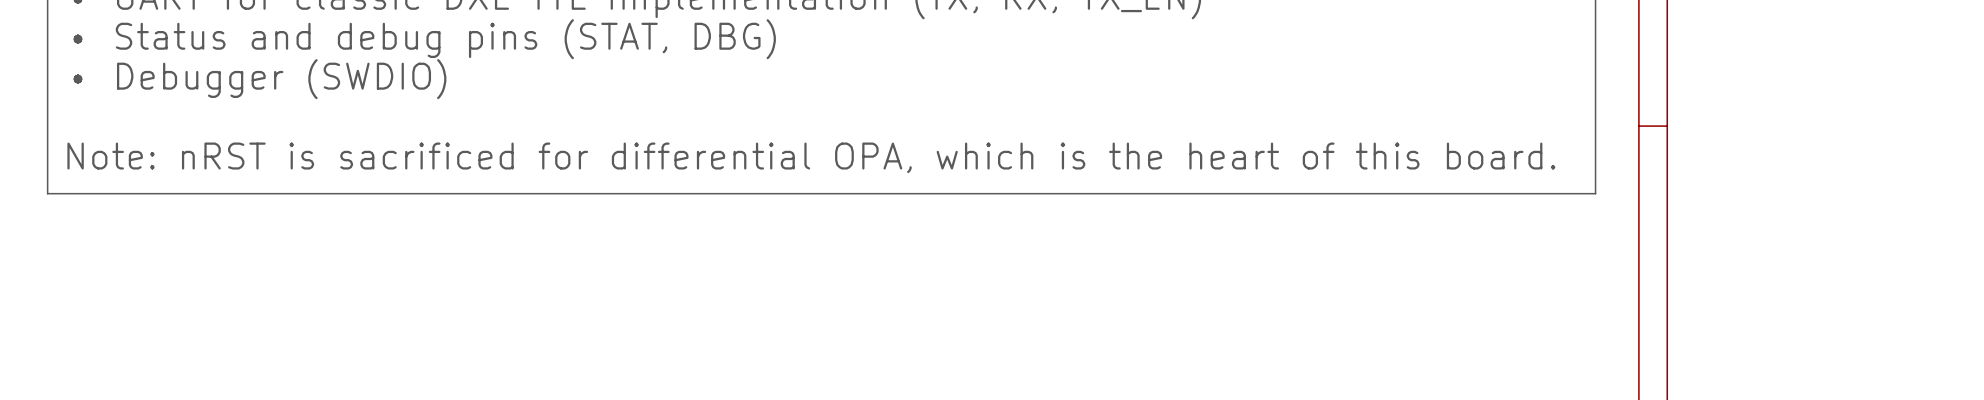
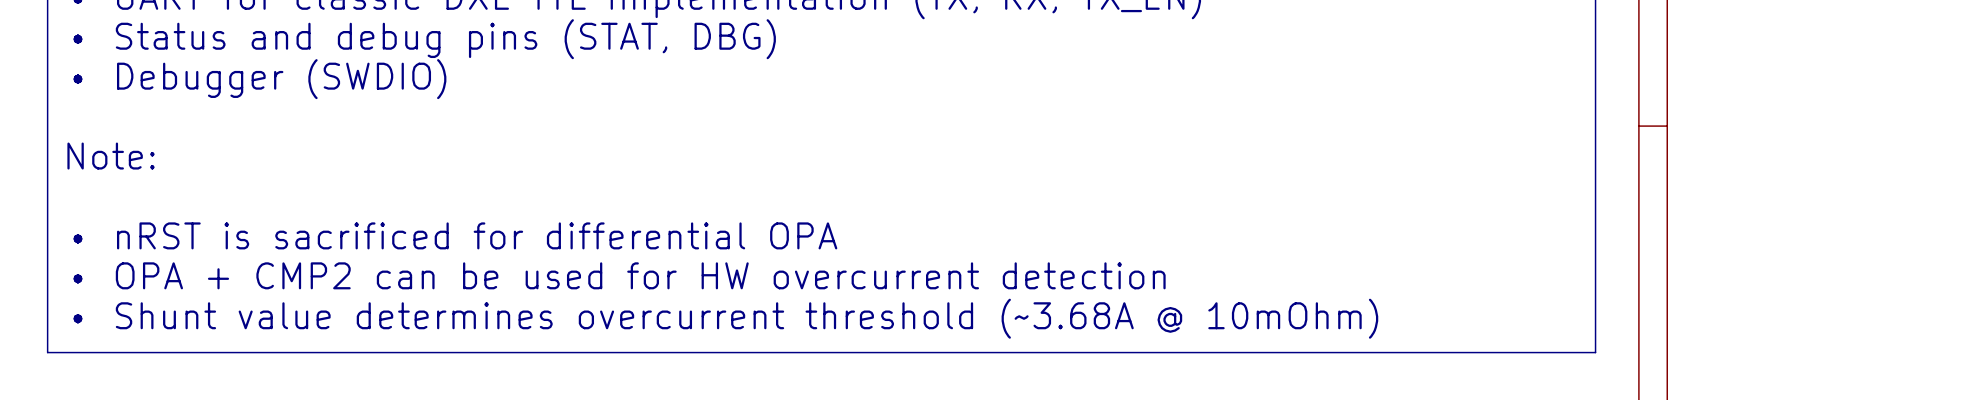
text: Note: nRST is sacrificed for differential OPA, which is the heart of this board. (811, 157) -> Note: (111, 156)
line: (47, 193) (1595, 193) -> (47, 193) (47, 352) (1595, 352) (1595, 193)
text: none -> • nRST is sacrificed for differential OPA (455, 235)
text: none -> • OPA + CMP2 can be used for HW overcurrent detection (619, 275)
text: none -> • Shunt value determines overcurrent threshold (~3.68A @ 10mOhm) (725, 318)

